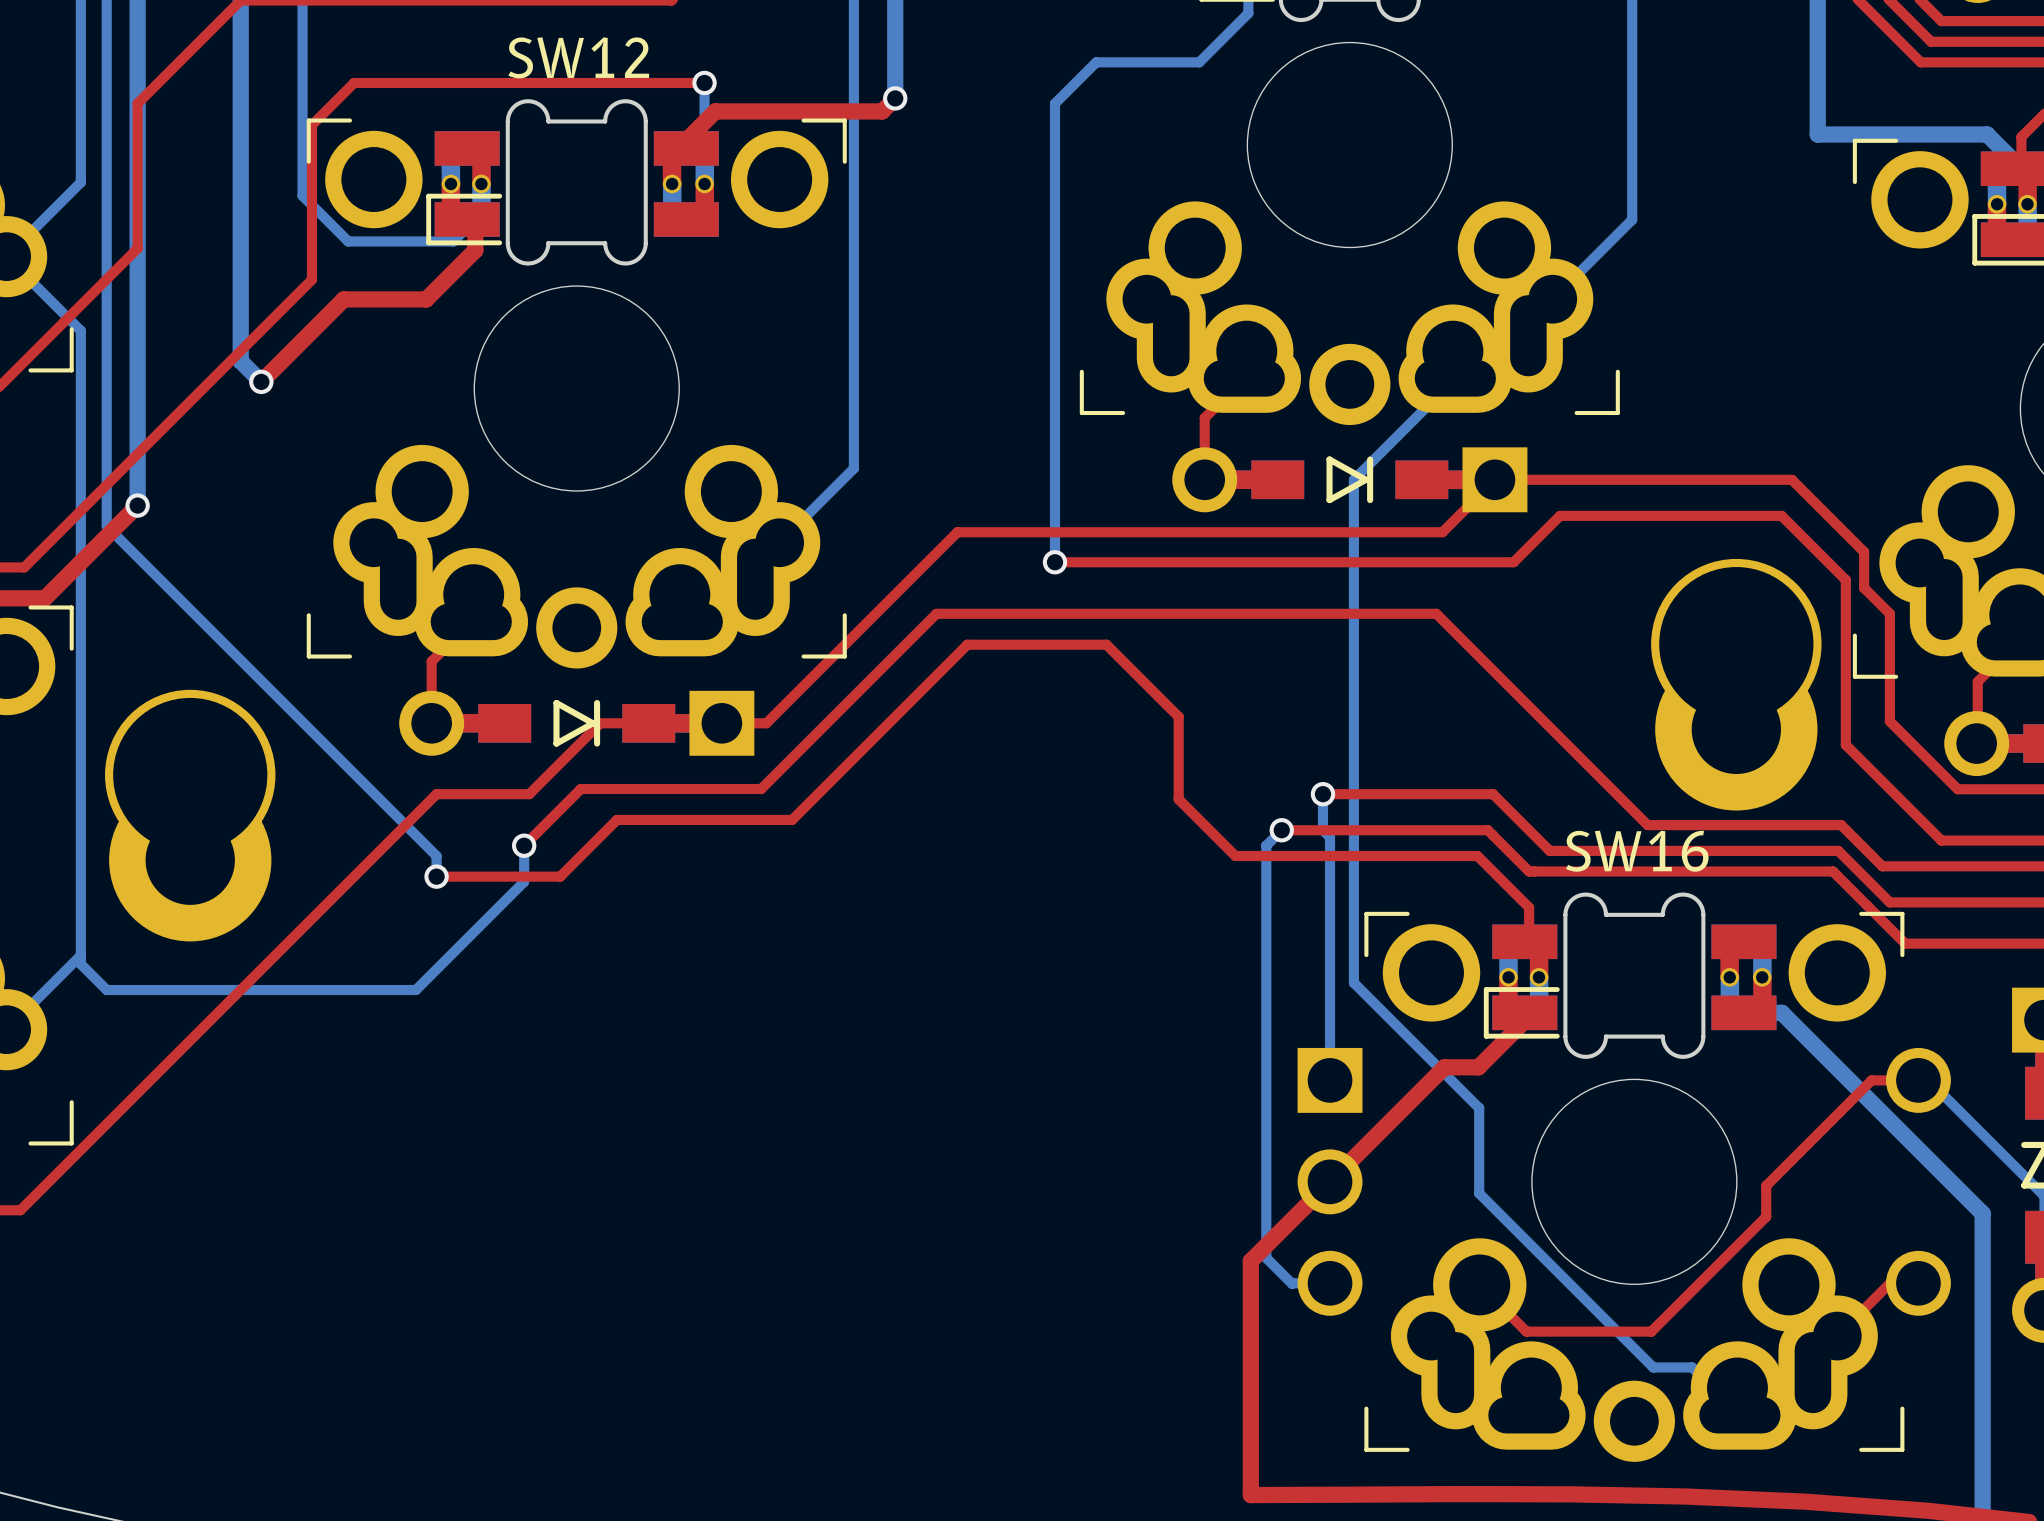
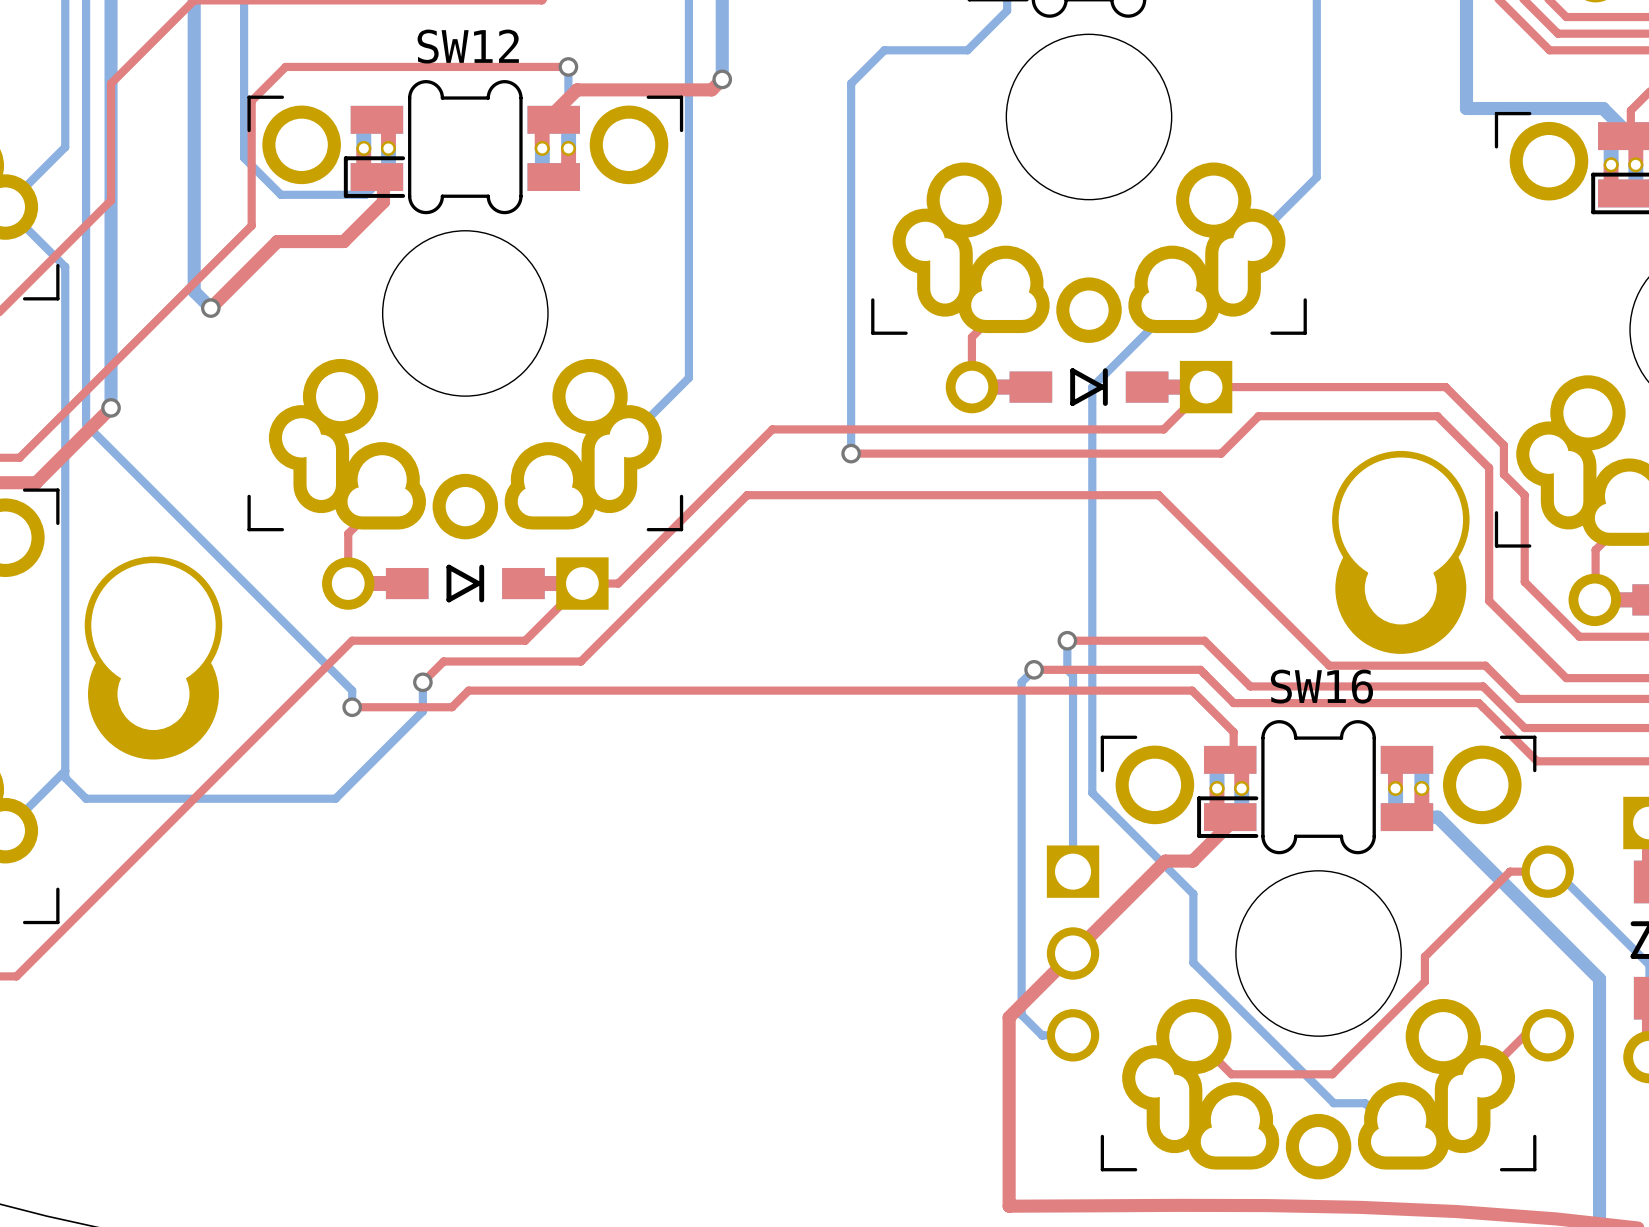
top track: (936, 613) (761, 789) (580, 789) (549, 819) -> (755, 495) (747, 495) (580, 661)
top track: (721, 723) (600, 723) (529, 794) -> (582, 583) (525, 640) (427, 640)
top track: (616, 819) (580, 856) -> (497, 661) (443, 661)
top track: (720, 819) (792, 819) (967, 644) (1106, 644) (1178, 716) (1178, 799) (1235, 856) -> (468, 690) (996, 690)

